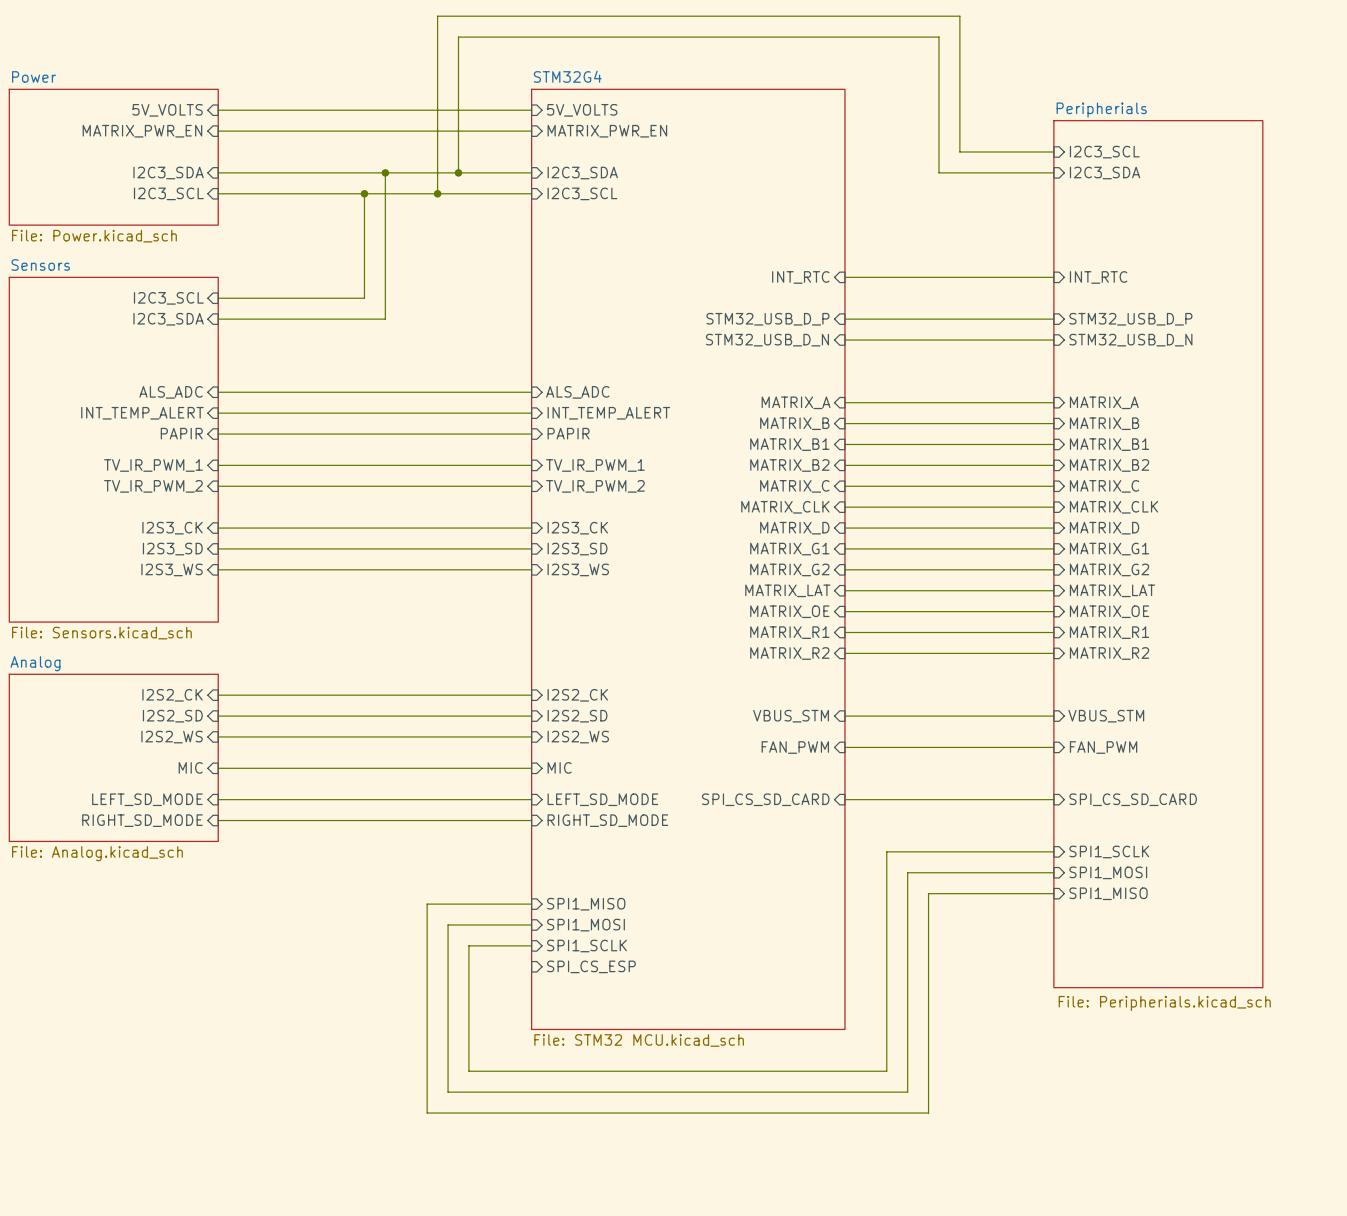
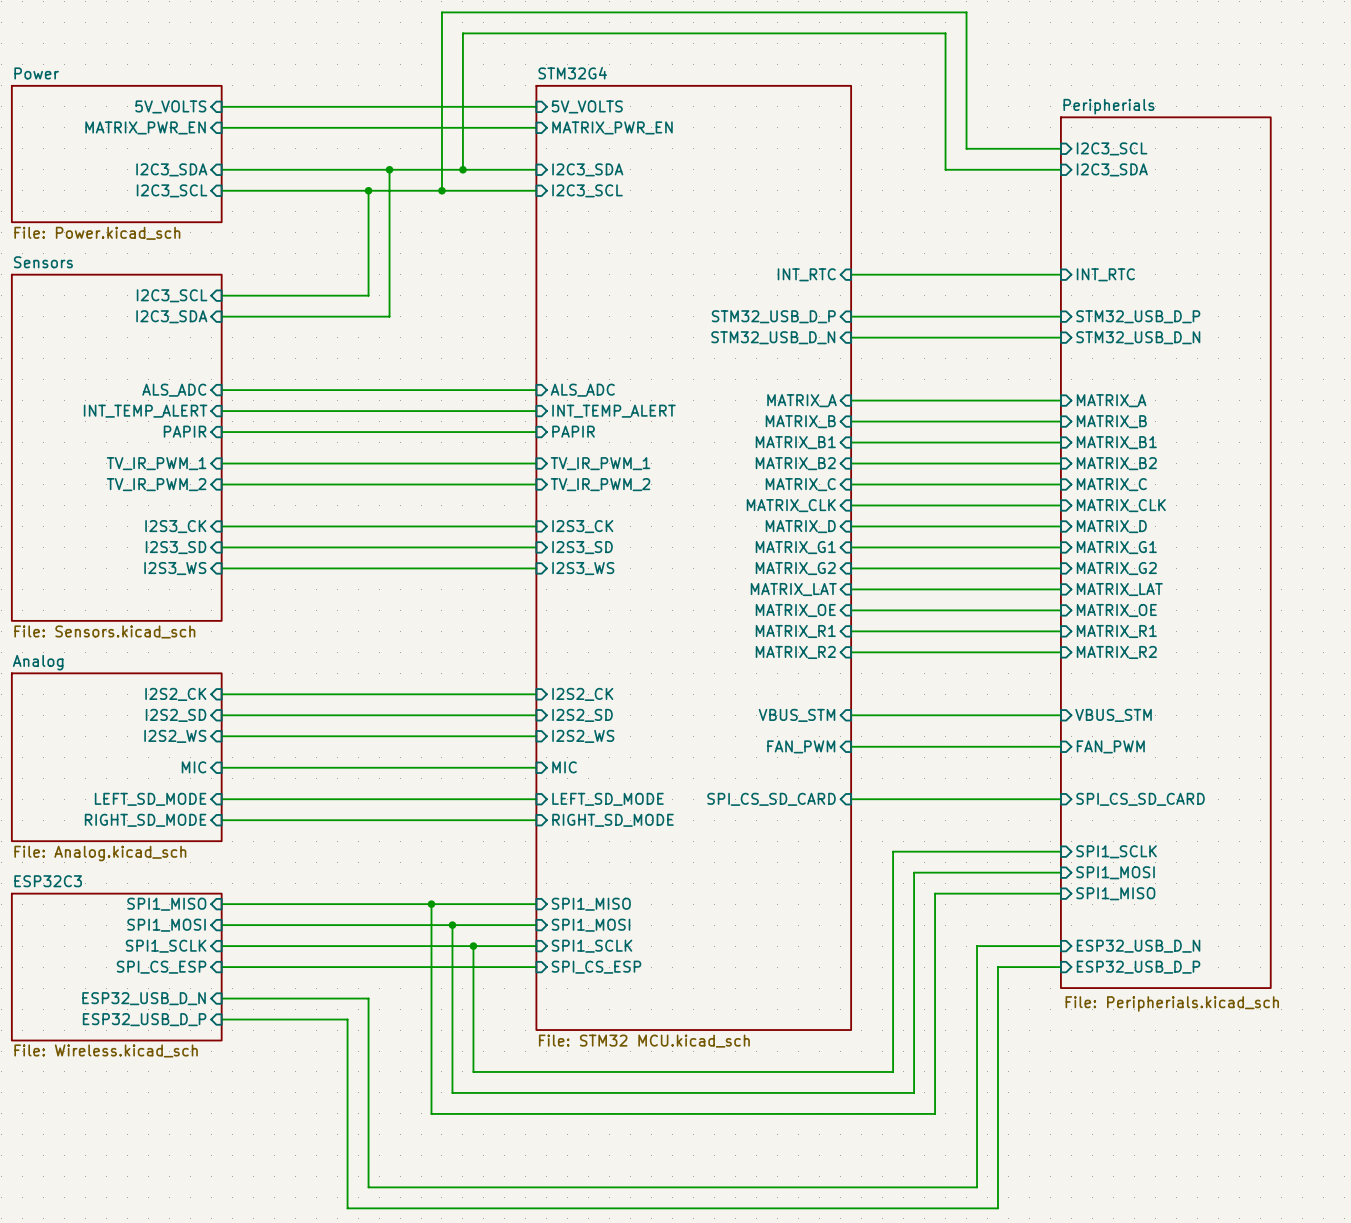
sheet pin: none -> SPI1_MISO (166, 904)
wire: none -> (221, 904) (431, 904)
junction: none -> (431, 904)
wire: none -> (221, 925) (452, 925)
junction: none -> (452, 925)
sheet pin: none -> SPI1_MOSI (166, 925)
sheet pin: none -> SPI1_SCLK (166, 946)
wire: none -> (221, 946) (473, 946)
junction: none -> (473, 946)
wire: none -> (1060, 946) (977, 946) (977, 1187) (368, 1187) (368, 998) (221, 998)
sheet pin: none -> ESP32_USB_D_N (1138, 946)
sheet ESP32C3: none -> File: Wireless.kicad_sch (116, 967)
sheet pin: none -> SPI_CS_ESP (161, 967)
wire: none -> (221, 967) (536, 967)
wire: none -> (1060, 967) (997, 967) (997, 1208) (347, 1208) (347, 1019) (221, 1019)
sheet pin: none -> ESP32_USB_D_P (1138, 967)
sheet pin: none -> ESP32_USB_D_N (144, 998)
sheet pin: none -> ESP32_USB_D_P (144, 1019)

